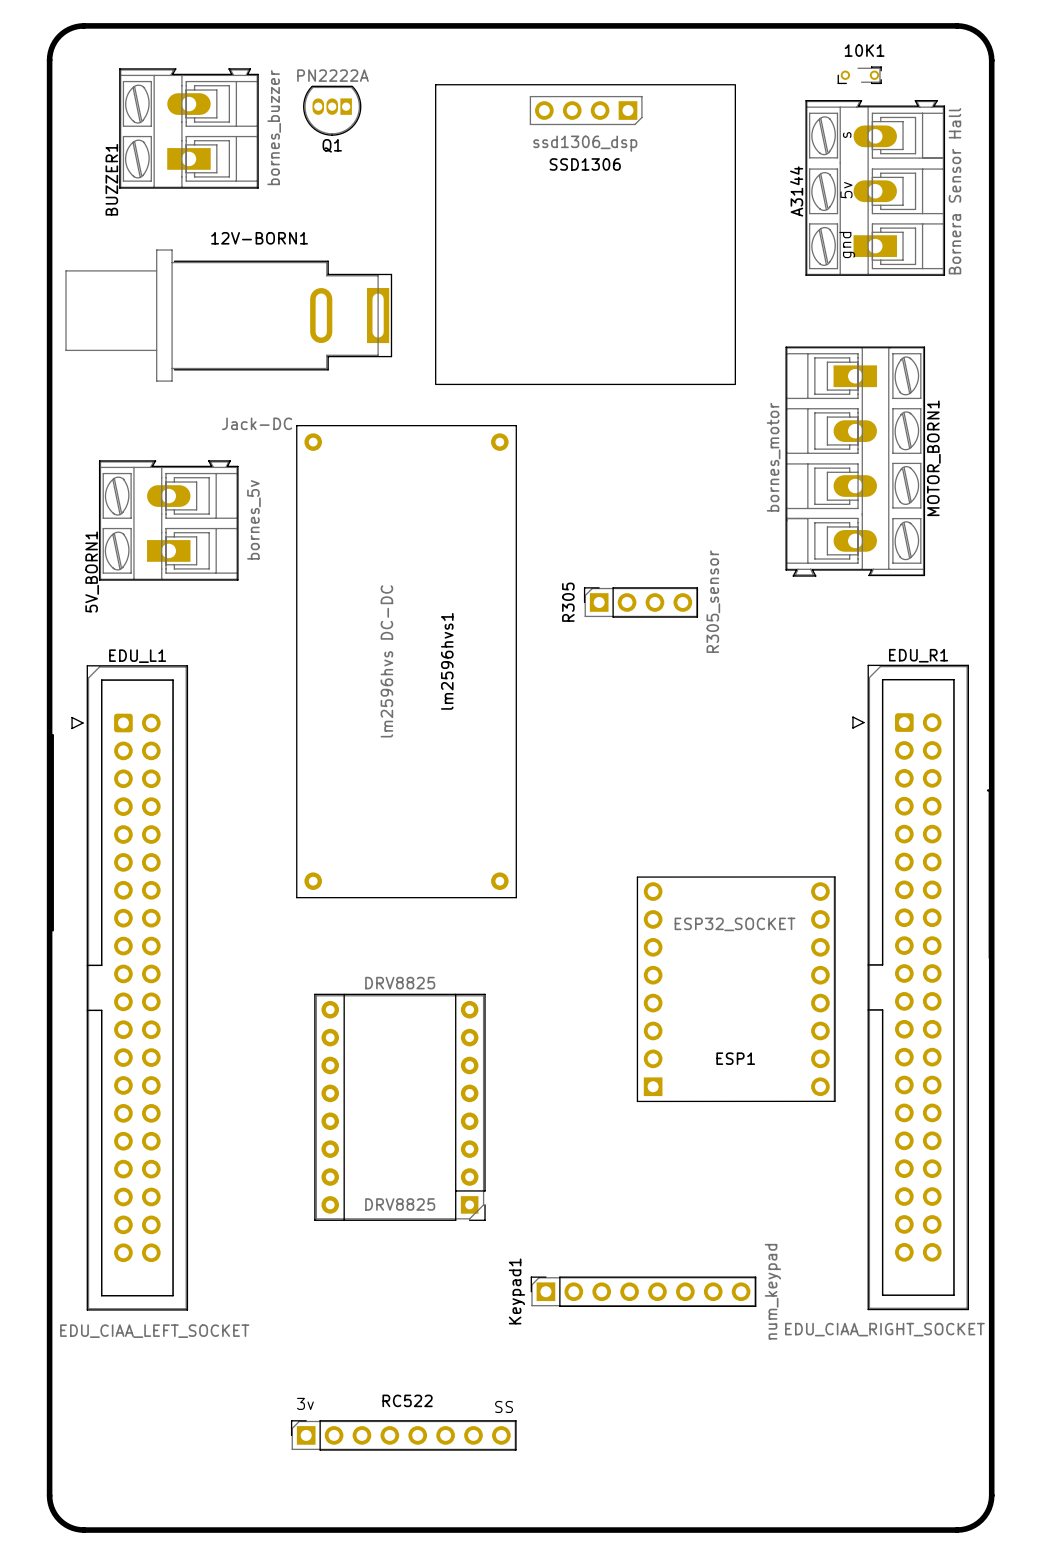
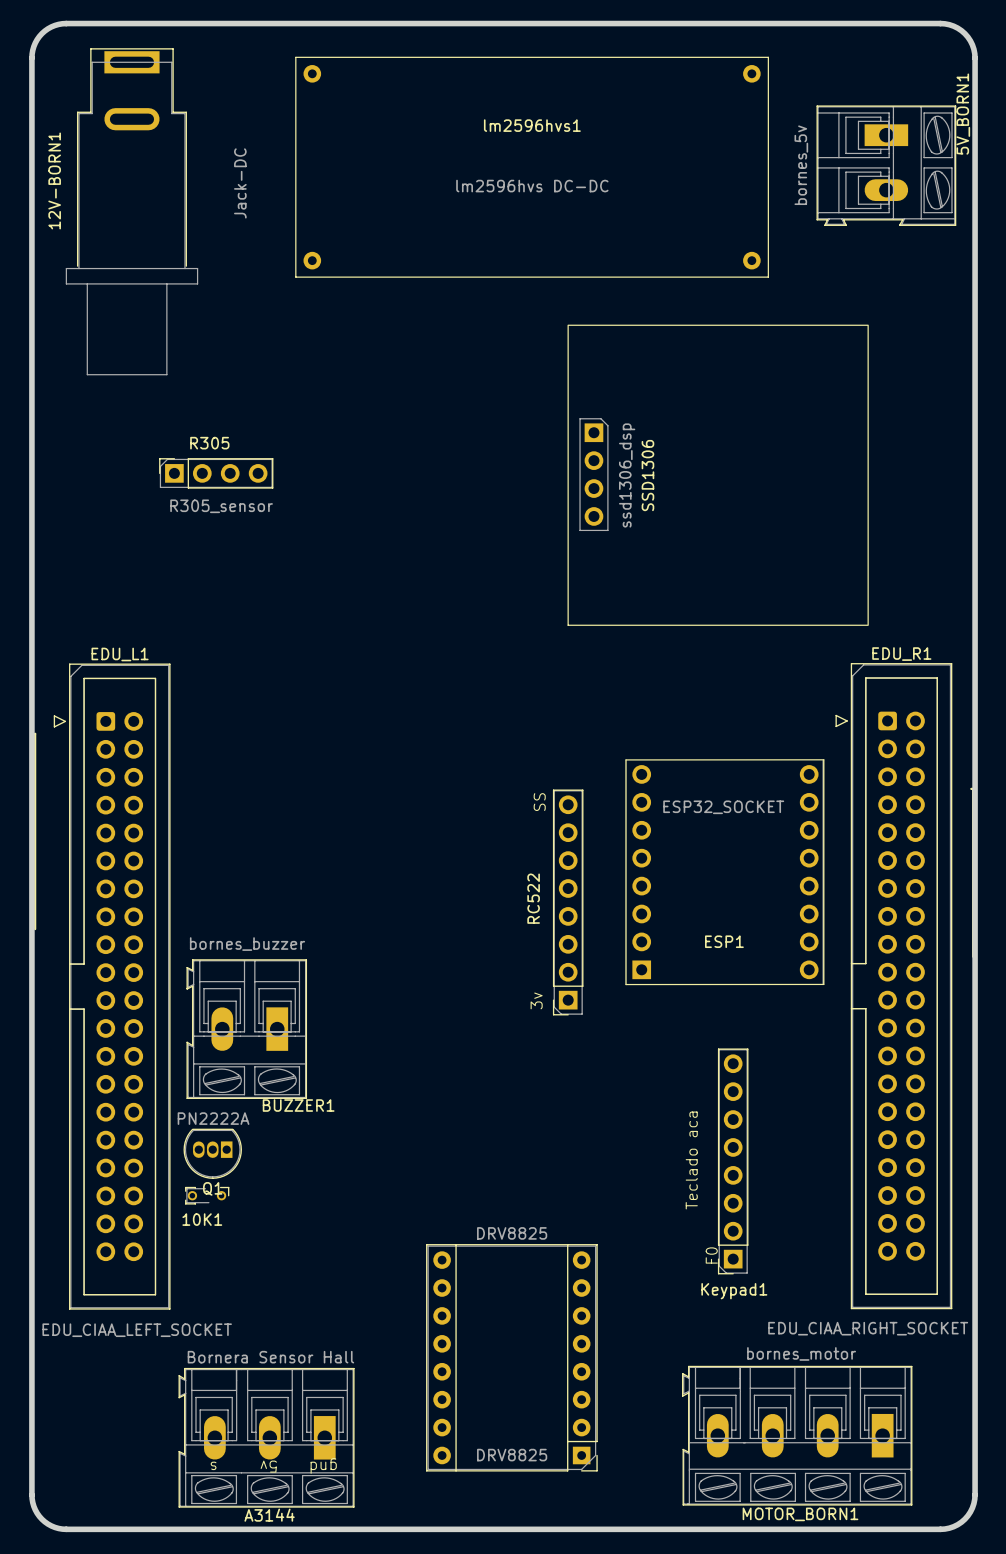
10K1 rotation: 0° (859, 75) -> 180° (207, 1195)
10K1 position: (859, 75) -> (207, 1195)
Q1 position: (332, 110) -> (212, 1153)
BUZZER1 rotation: 0° (188, 128) -> 90° counterclockwise (246, 1029)
BUZZER1 position: (188, 128) -> (246, 1029)
A3144 rotation: 0° (875, 187) -> 90° counterclockwise (266, 1437)
A3144 position: (875, 187) -> (266, 1437)
SSD1306 rotation: 0° (585, 234) -> 90° counterclockwise (718, 475)
SSD1306 position: (585, 234) -> (718, 475)
12V-BORN1 rotation: 0° (228, 315) -> 90° counterclockwise (131, 211)
MOTOR_BORN1 rotation: 0° (855, 461) -> 90° clockwise (797, 1435)
MOTOR_BORN1 position: (855, 461) -> (797, 1435)
5V_BORN1 rotation: 0° (168, 520) -> 180° (886, 165)
5V_BORN1 position: (168, 520) -> (886, 165)
R305 value rotation: 0° (713, 601) -> 90° clockwise (221, 506)
R305 name rotation: 0° (568, 602) -> 90° clockwise (209, 443)
R305 name position: R305 (568, 602) -> R305 (209, 443)
R305 position: (641, 602) -> (216, 473)
lm2596hvs1 value position: lm2596hvs DC-DC (386, 661) -> lm2596hvs DC-DC (532, 186)
lm2596hvs1 rotation: 0° (406, 661) -> 90° clockwise (532, 167)
lm2596hvs1 position: (406, 661) -> (532, 167)
lm2596hvs1 name position: lm2596hvs1 (447, 661) -> lm2596hvs1 (532, 125)
ESP1 position: (736, 989) -> (724, 872)
DRV8825 position: (399, 1107) -> (511, 1357)
Keypad1 footprint: [530, 1276, 757, 1307] -> [717, 1048, 749, 1275]
Keypad1 name position: Keypad1 (516, 1291) -> Keypad1 (734, 1291)
Keypad1 value: num_keypad (772, 1291) -> none
RC522 rotation: 0° (403, 1435) -> 90° counterclockwise (568, 902)
RC522 position: (403, 1435) -> (568, 902)

